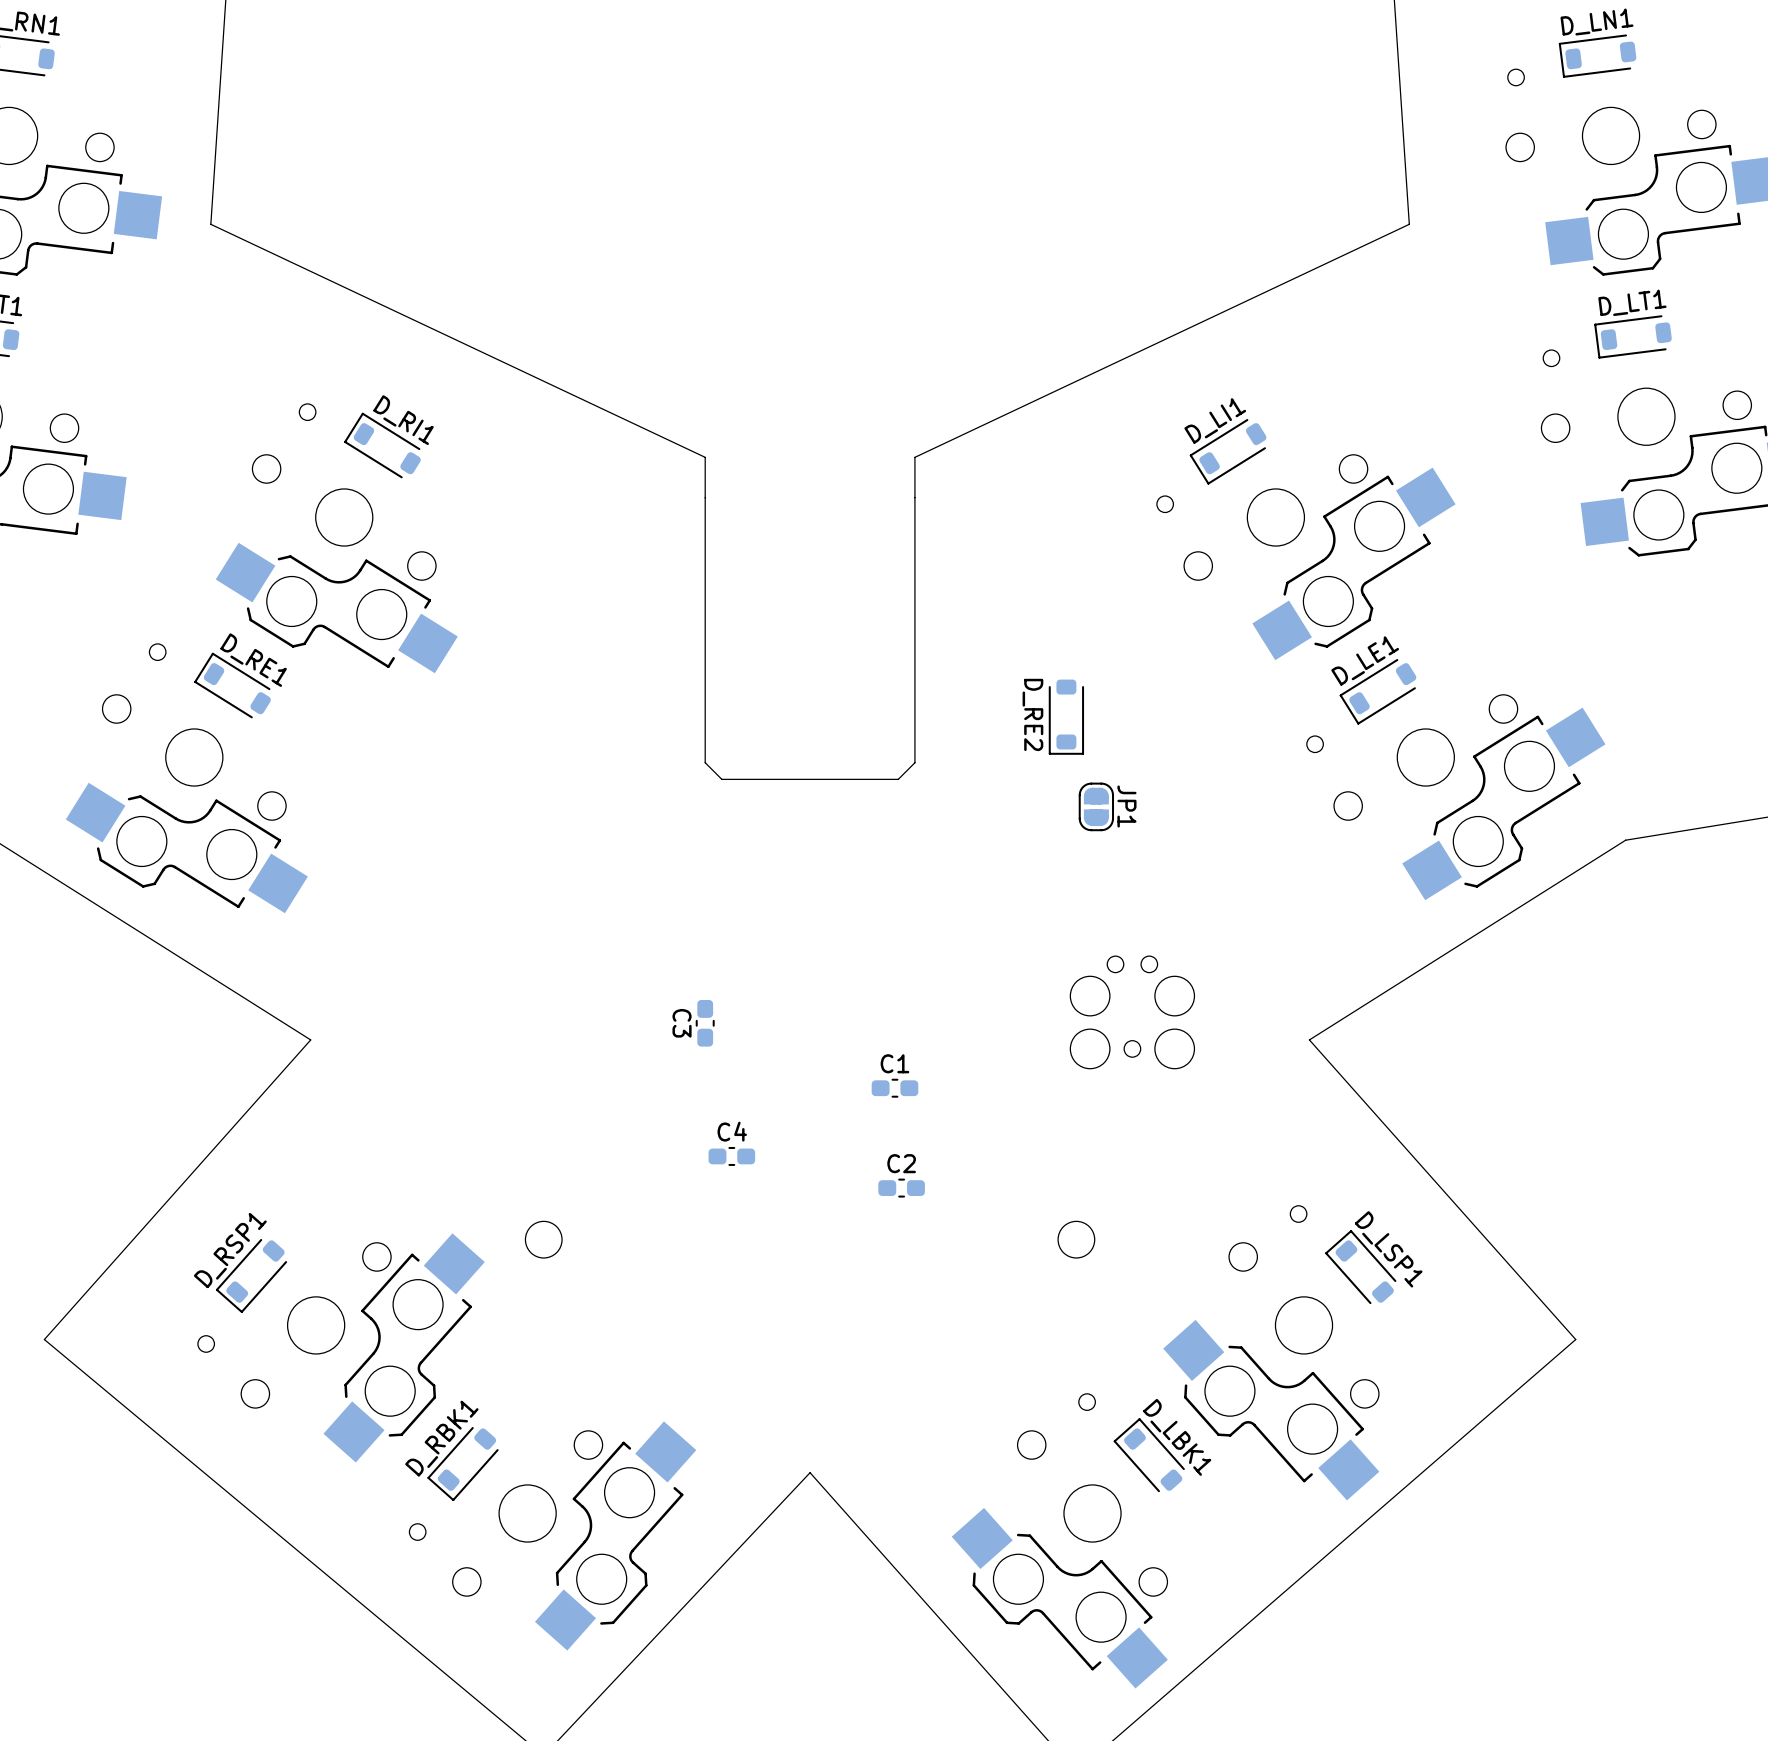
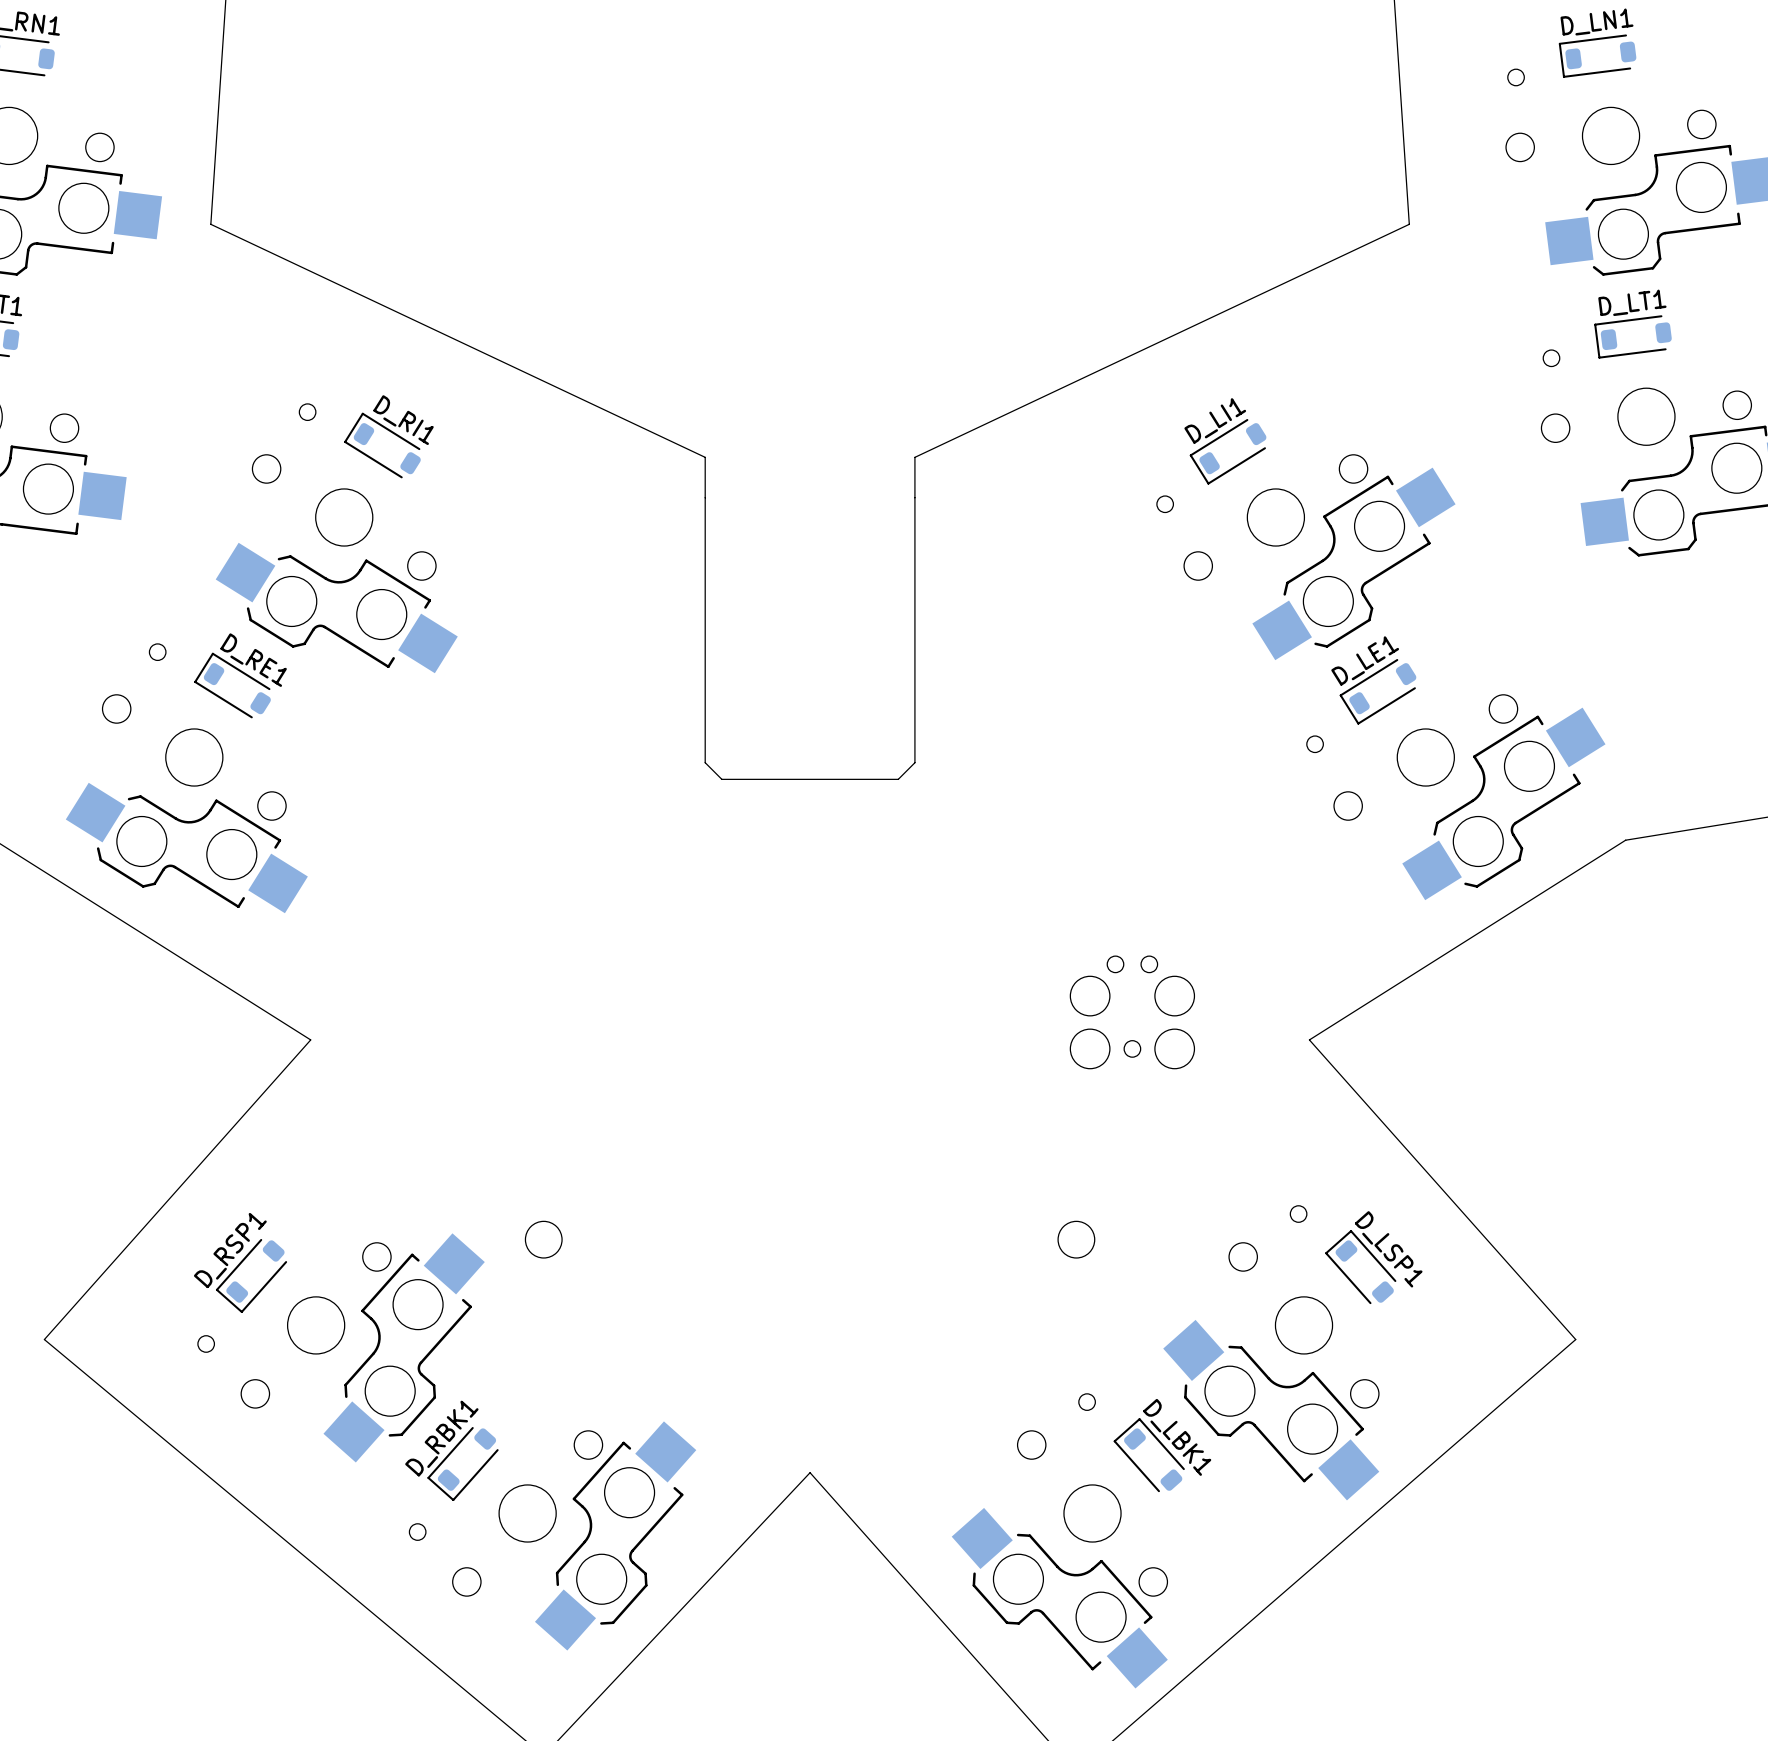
D_RE2: (1066, 717) -> none
JP1: (1096, 806) -> none
C3: (705, 1023) -> none
C1: (894, 1088) -> none
C4: (731, 1156) -> none
C2: (901, 1188) -> none

